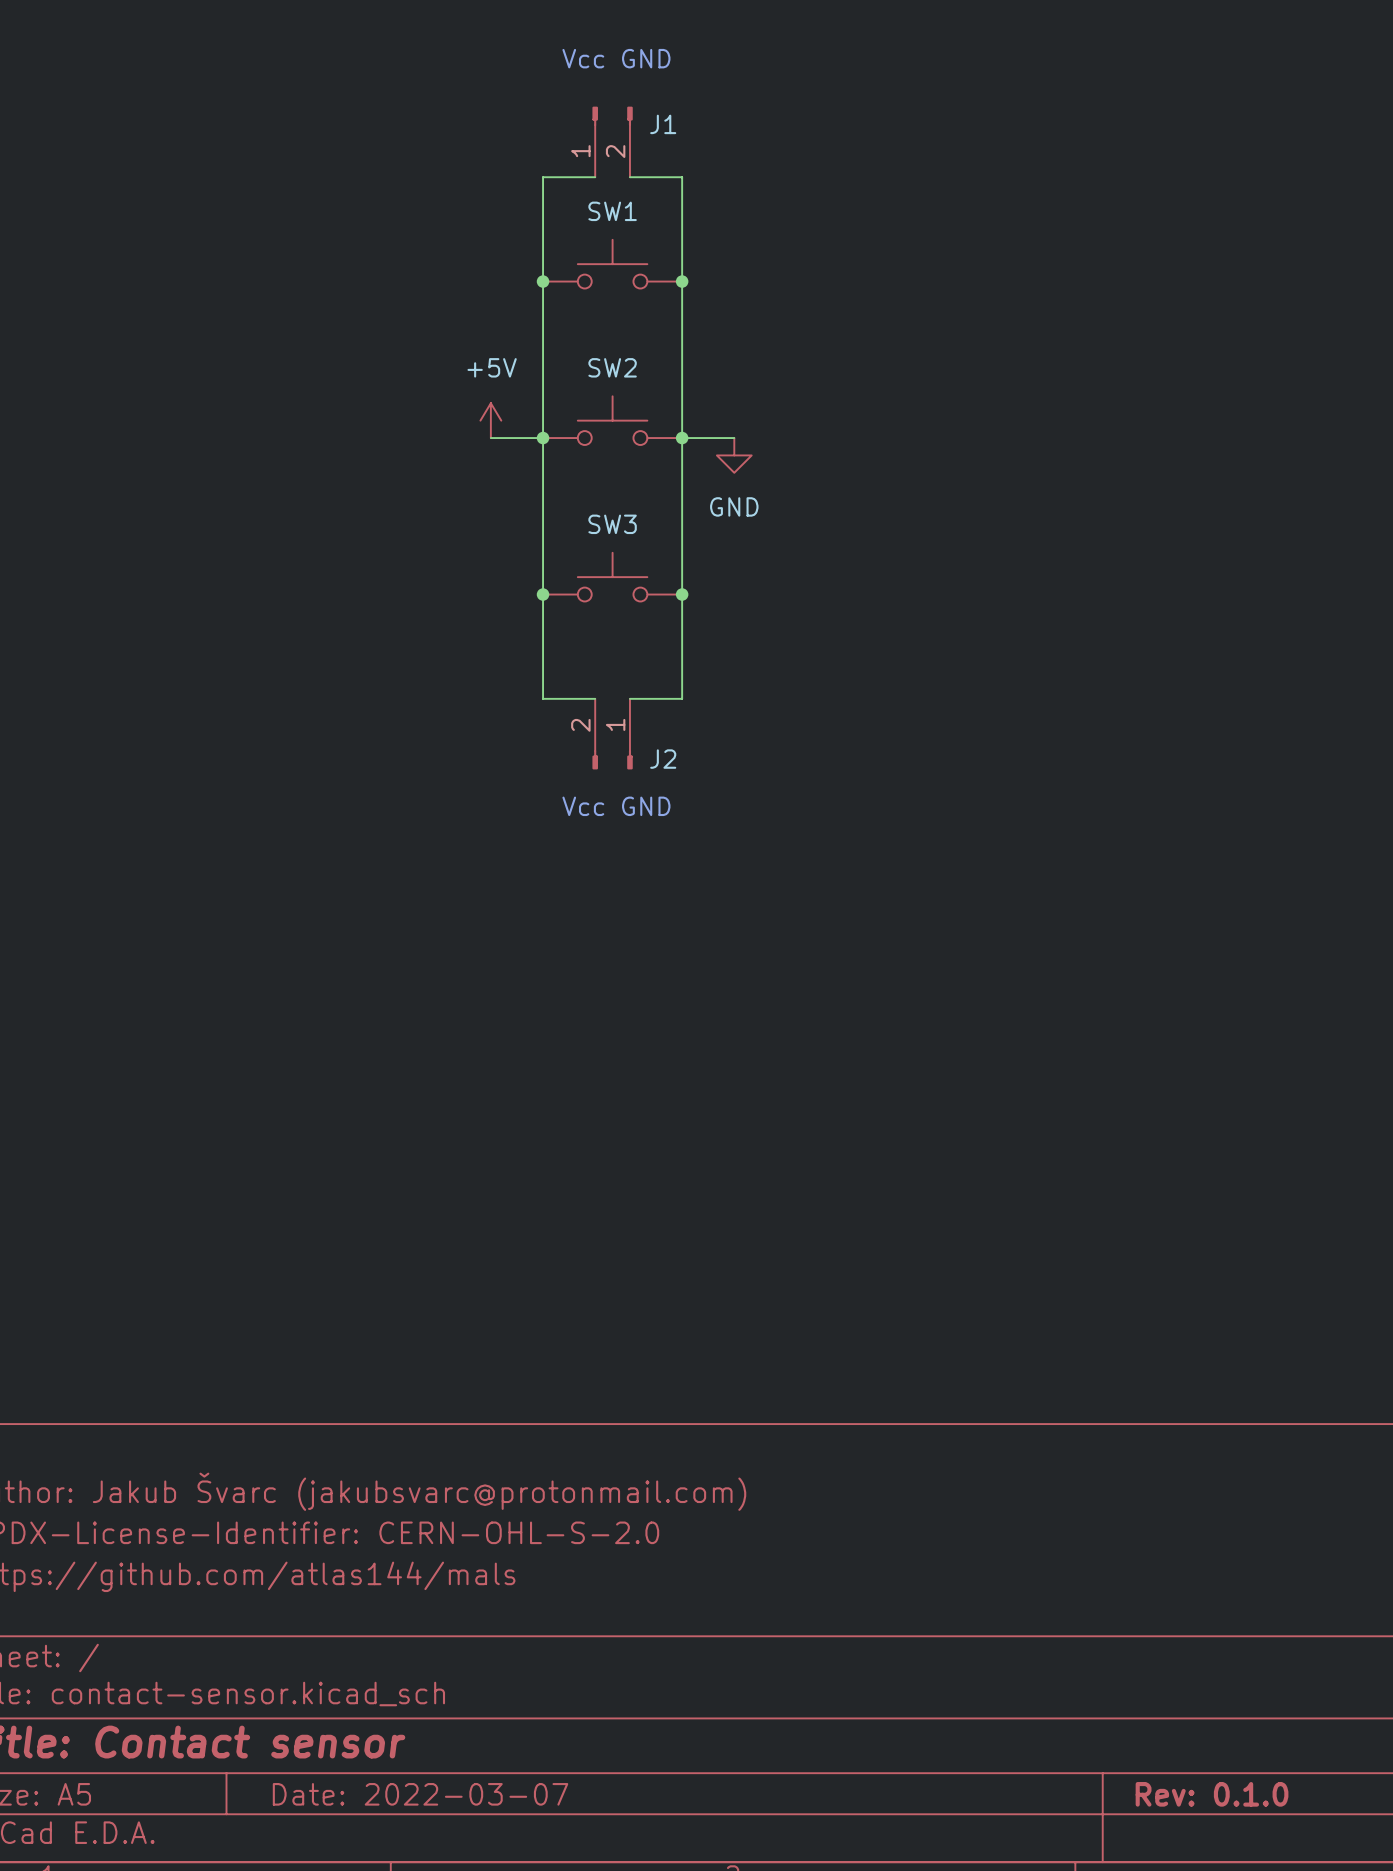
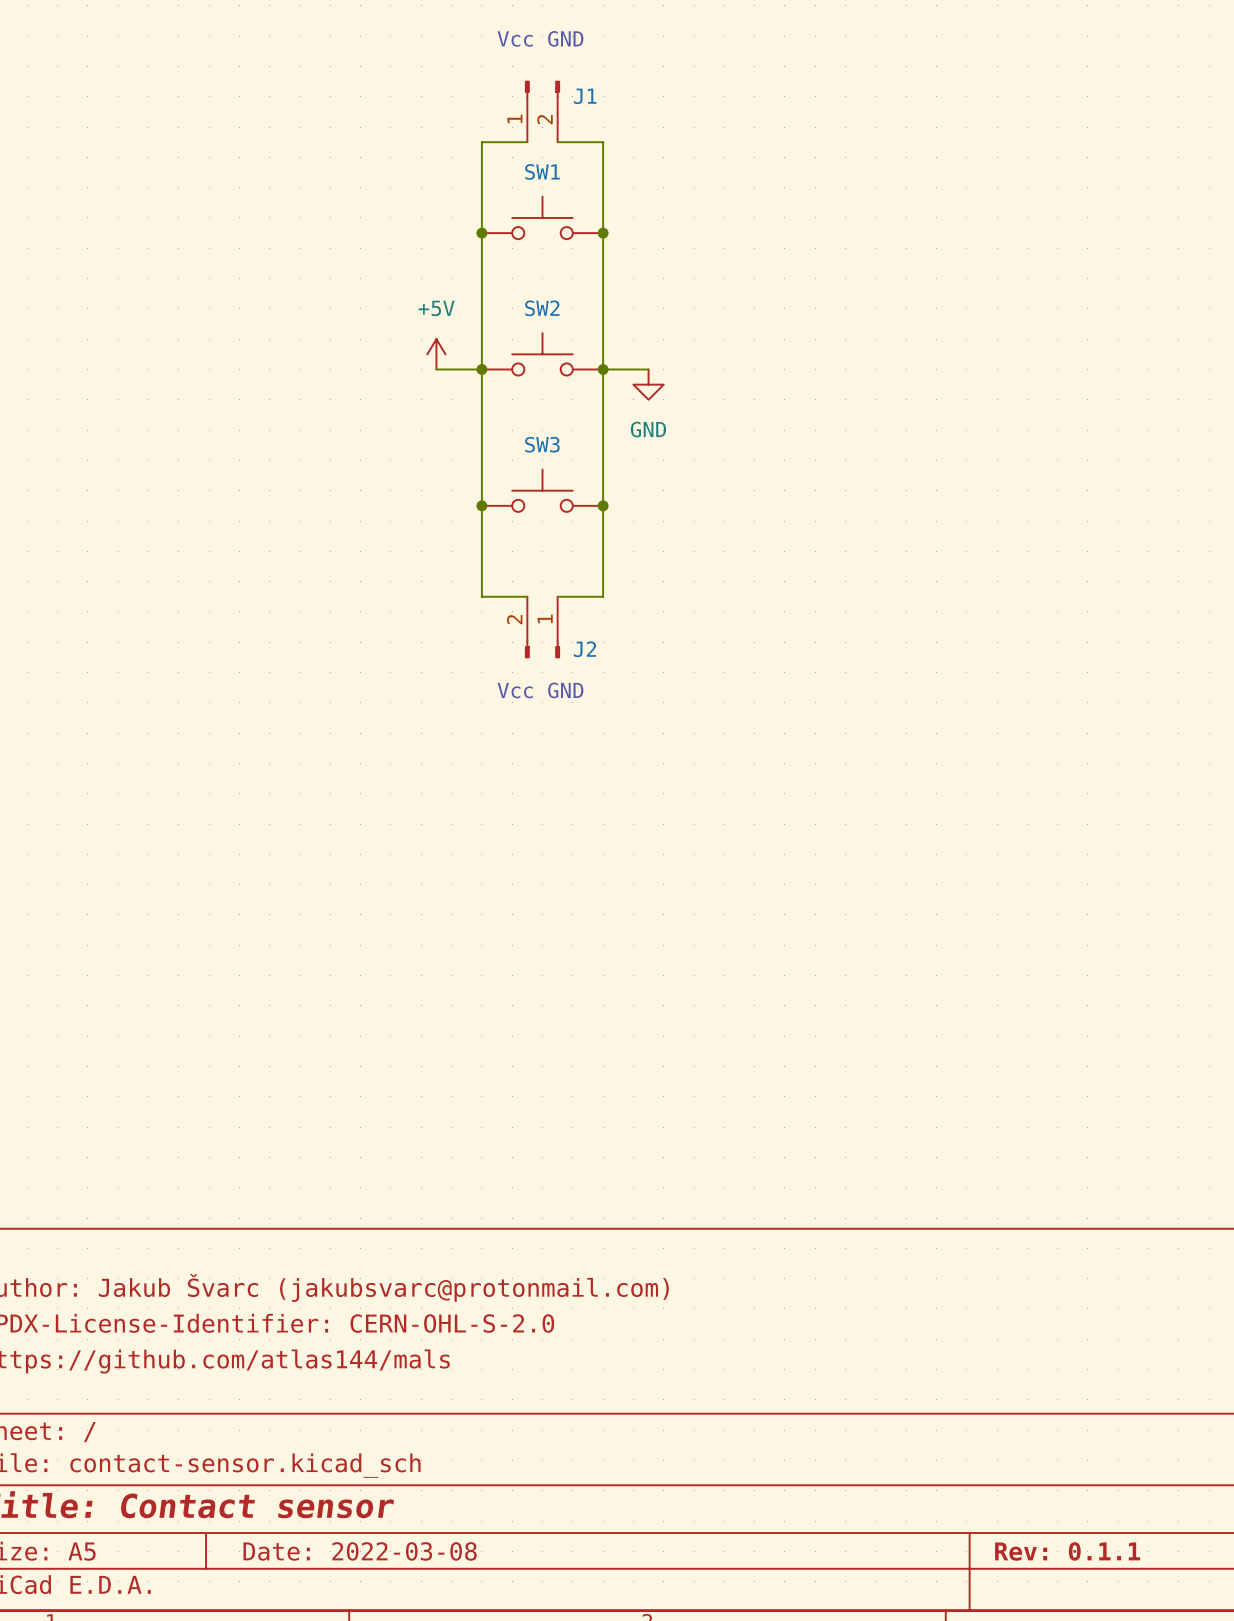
title block: Date: 2022-03-07 (420, 1794) -> Date: 2022-03-08 (360, 1551)
title block: Rev: 0.1.0 (1212, 1794) -> Rev: 0.1.1 (1067, 1551)

